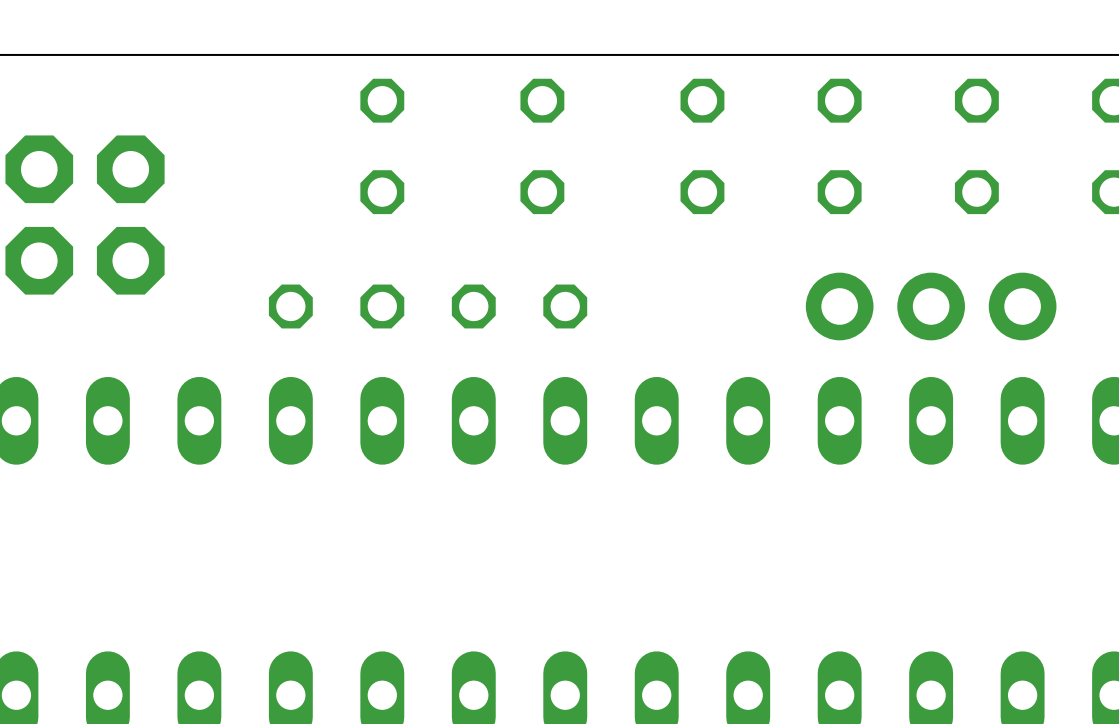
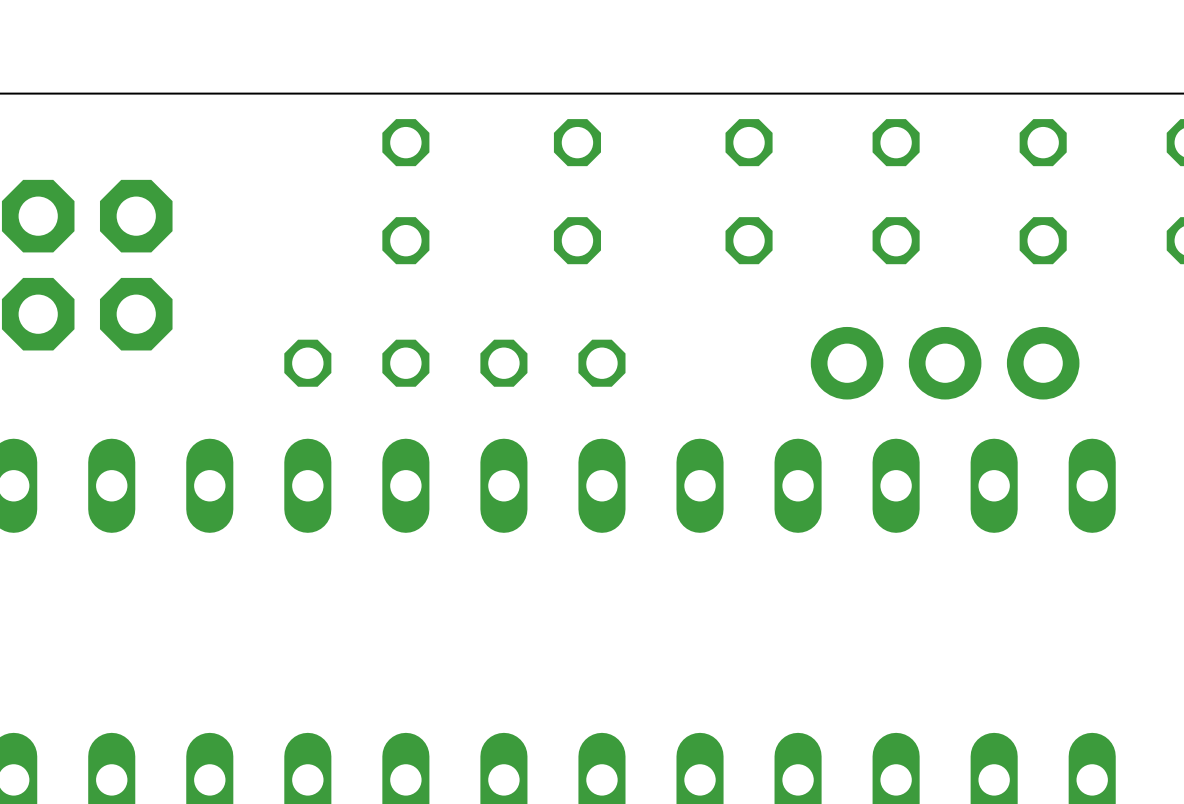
part position: (931, 306) -> (945, 363)

